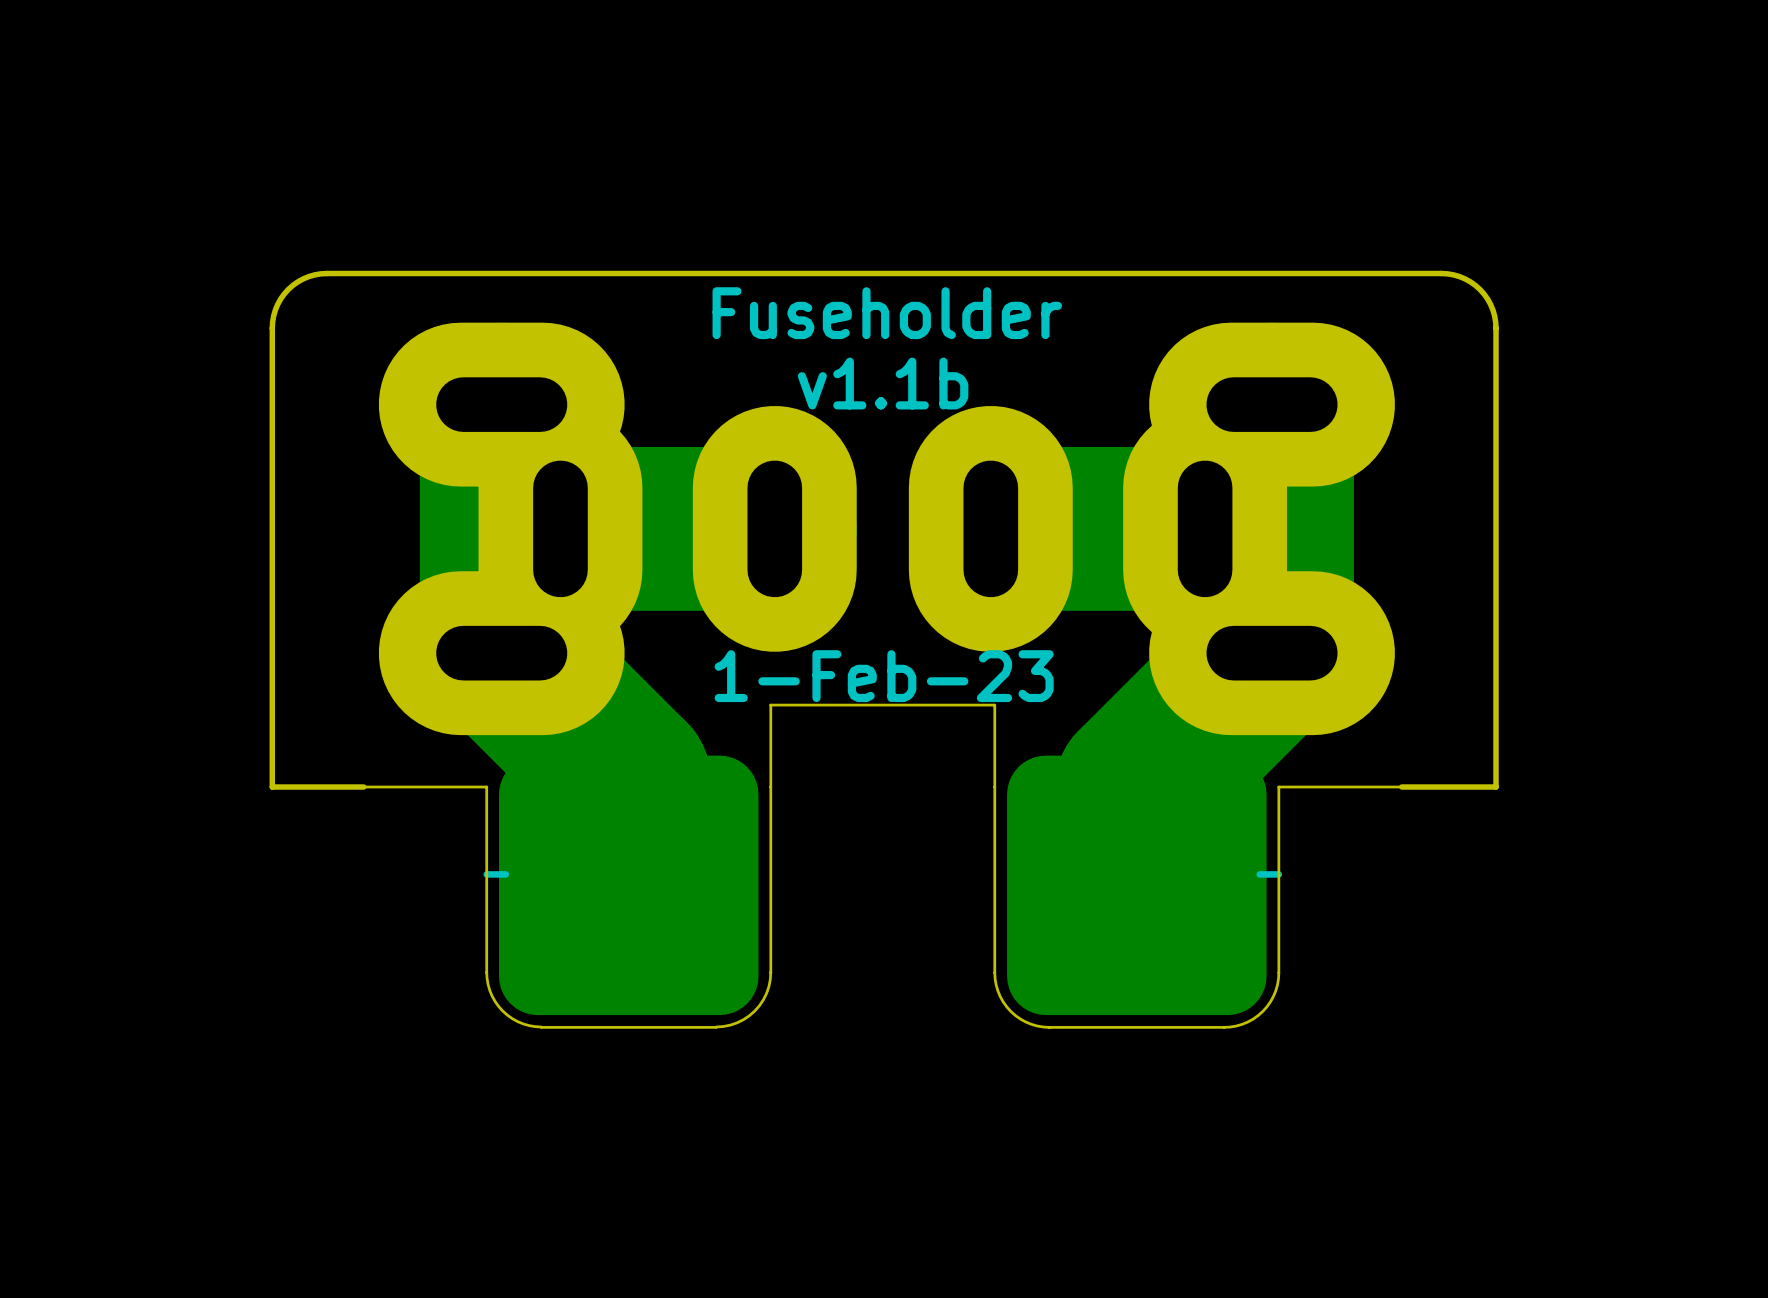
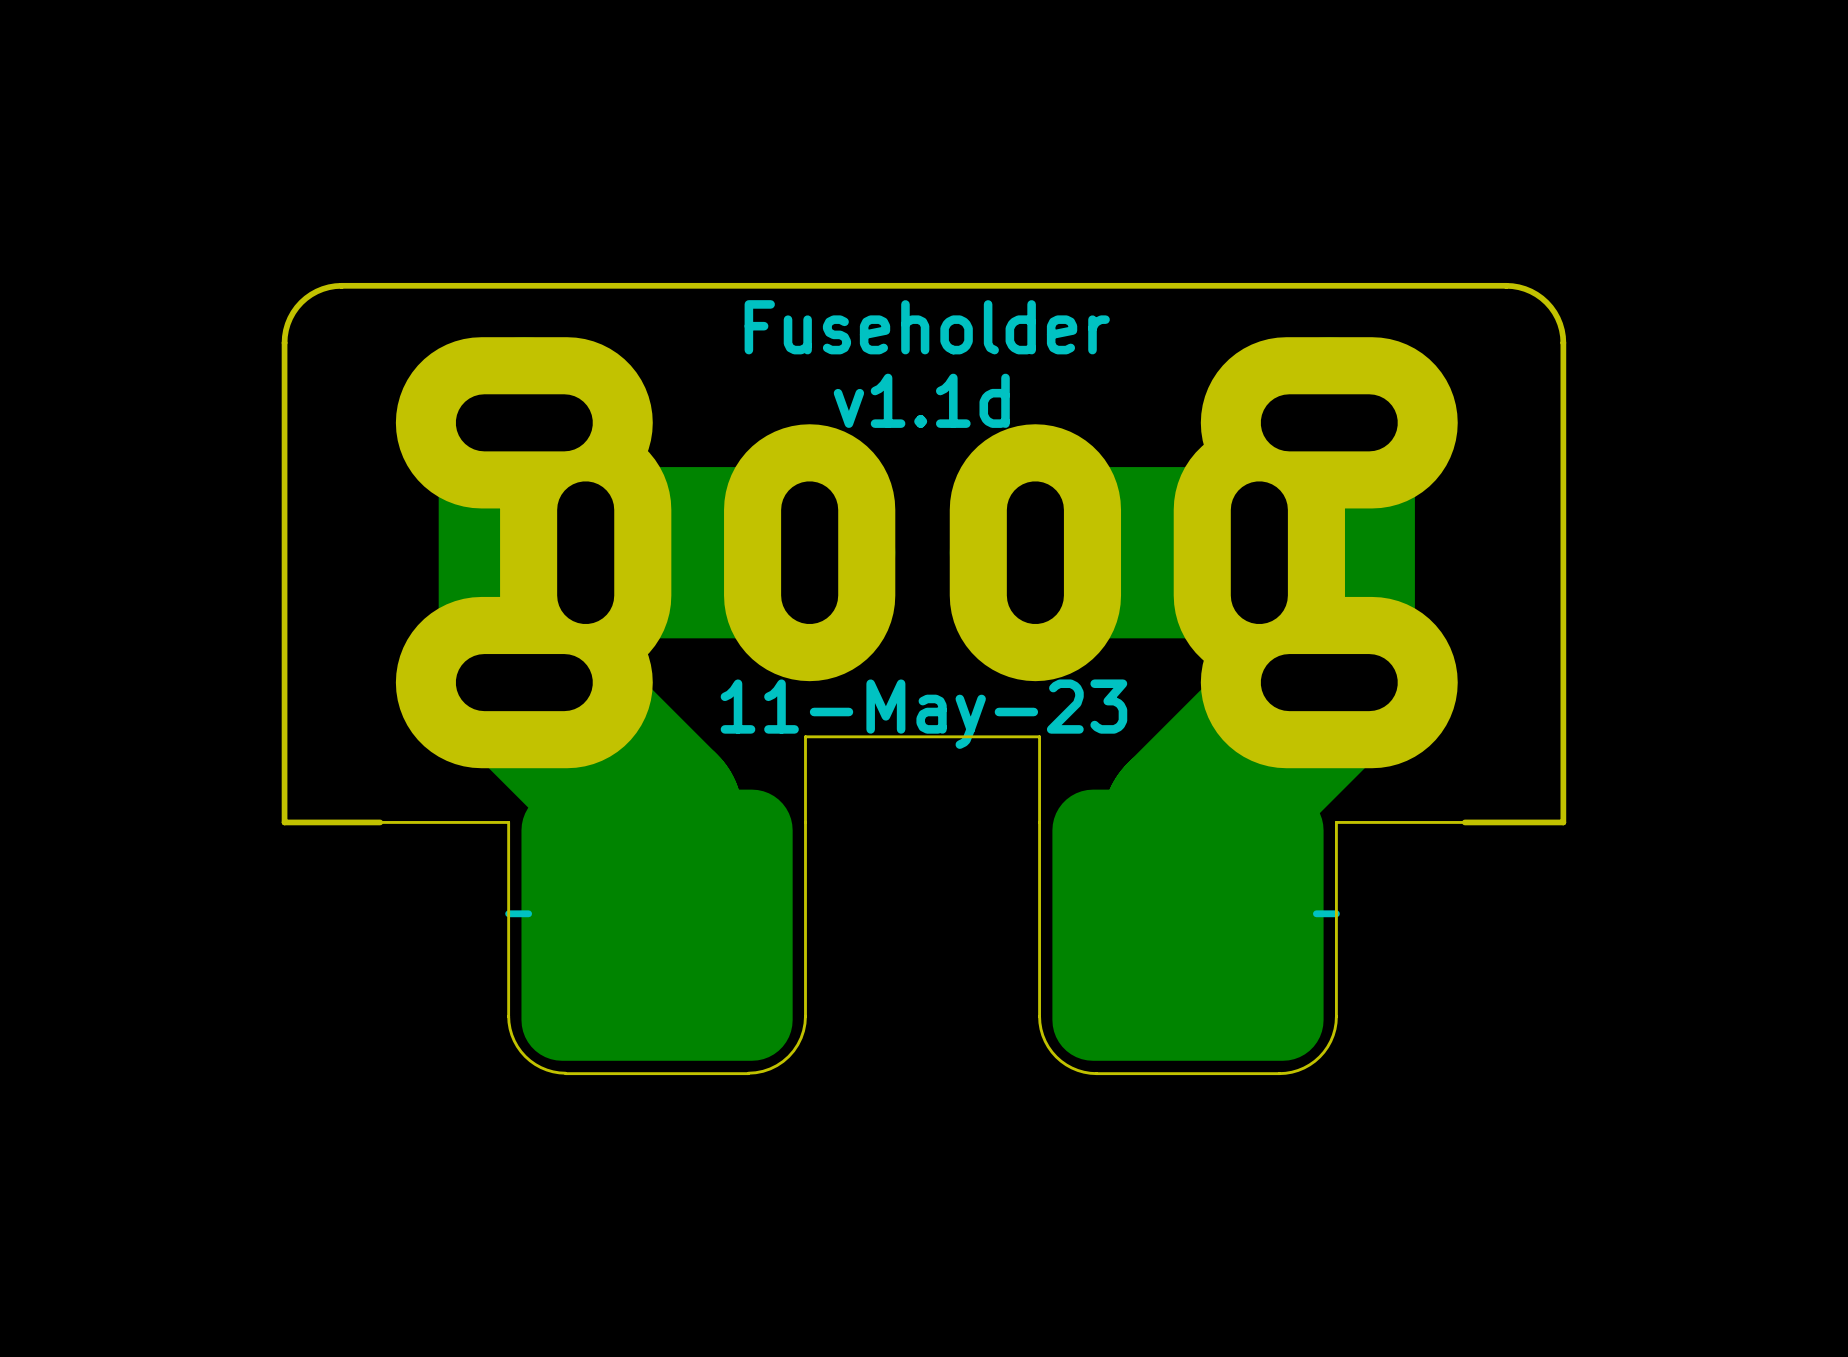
text: v1.1b (883, 383) -> v1.1d (921, 400)
text: 1-Feb-23 (884, 676) -> 11-May-23 (923, 714)

